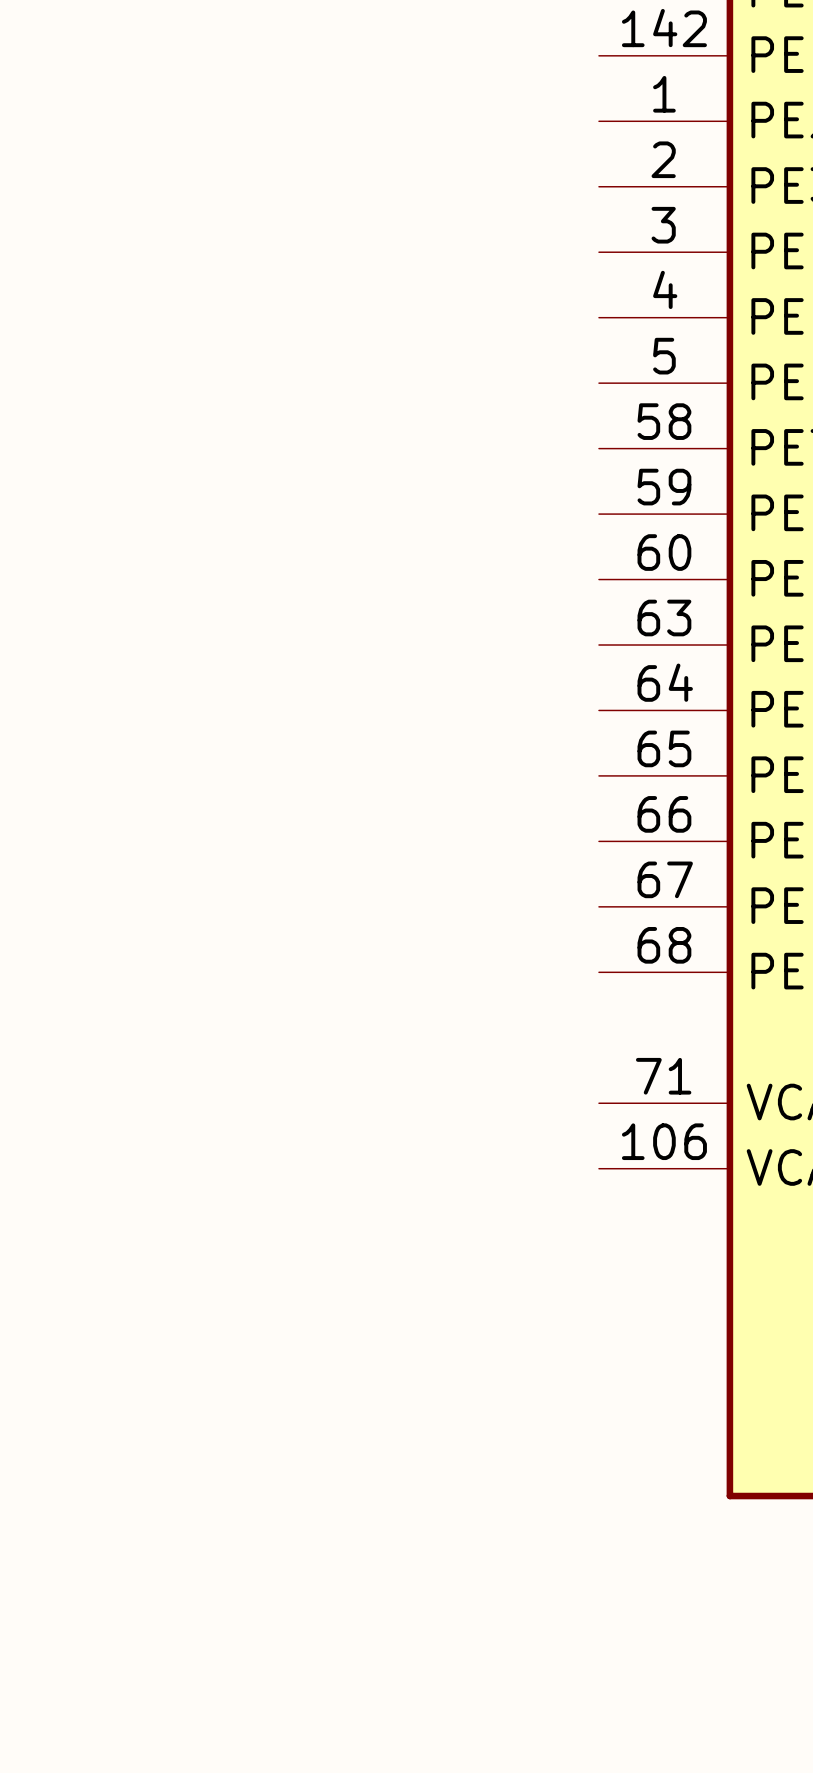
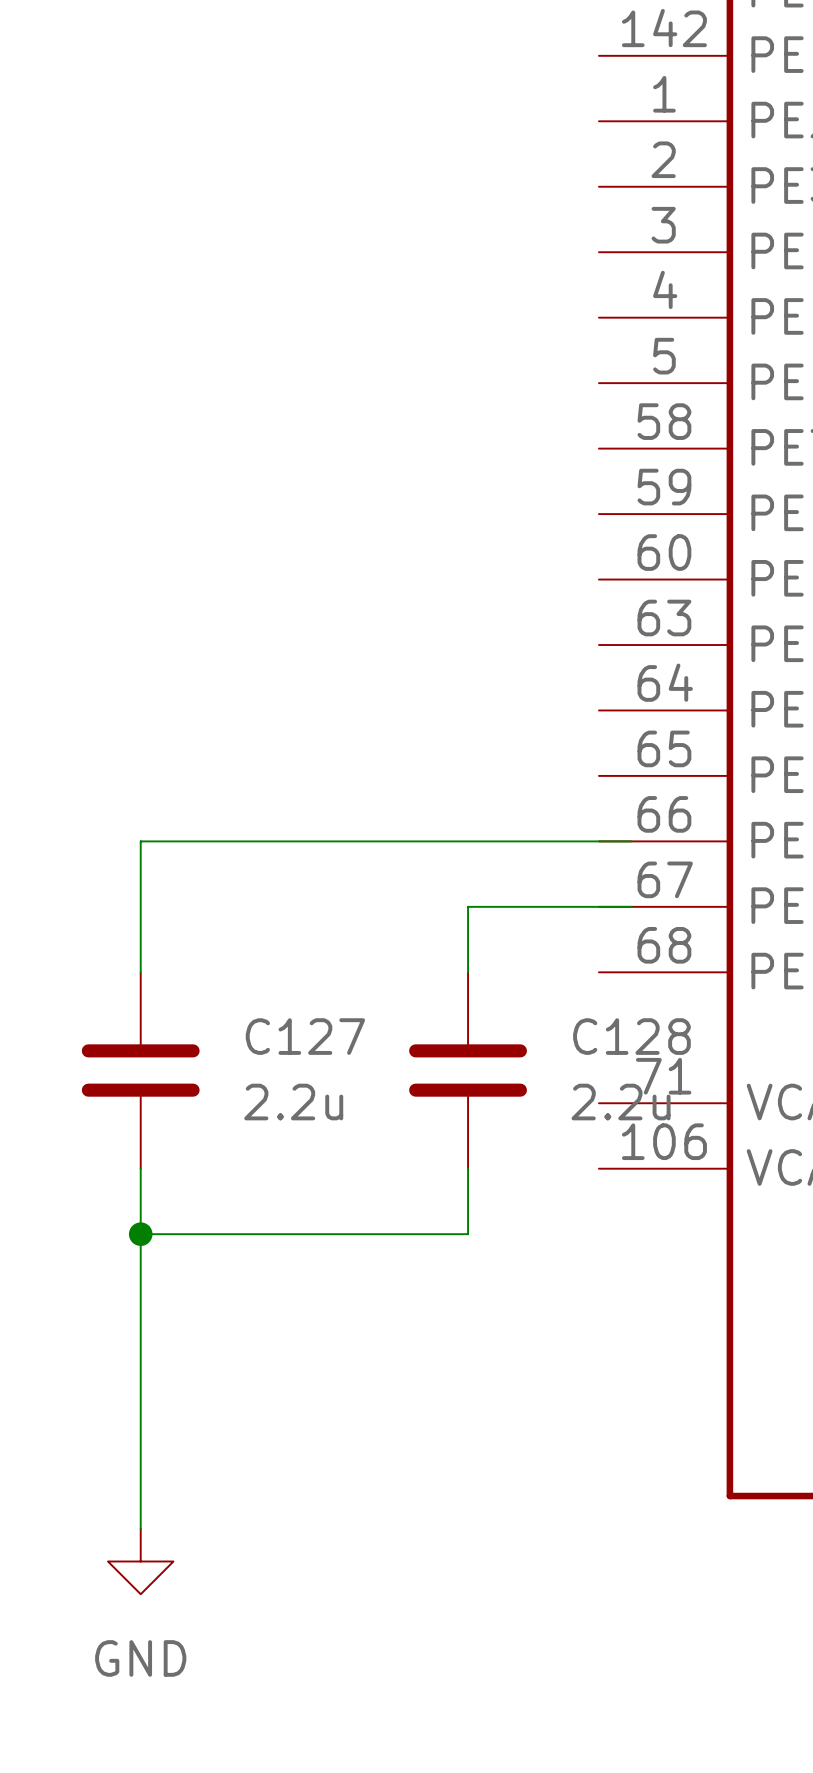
wire: none -> (631, 841) (140, 841) (140, 972)
wire: none -> (631, 906) (468, 906) (468, 972)
C127: none -> 2.2u (140, 1070)
C128: none -> 2.2u (468, 1070)
wire: none -> (140, 1168) (140, 1528)
wire: none -> (468, 1168) (468, 1234) (140, 1234)
junction: none -> (140, 1234)
power symbol: none -> GND (140, 1561)

